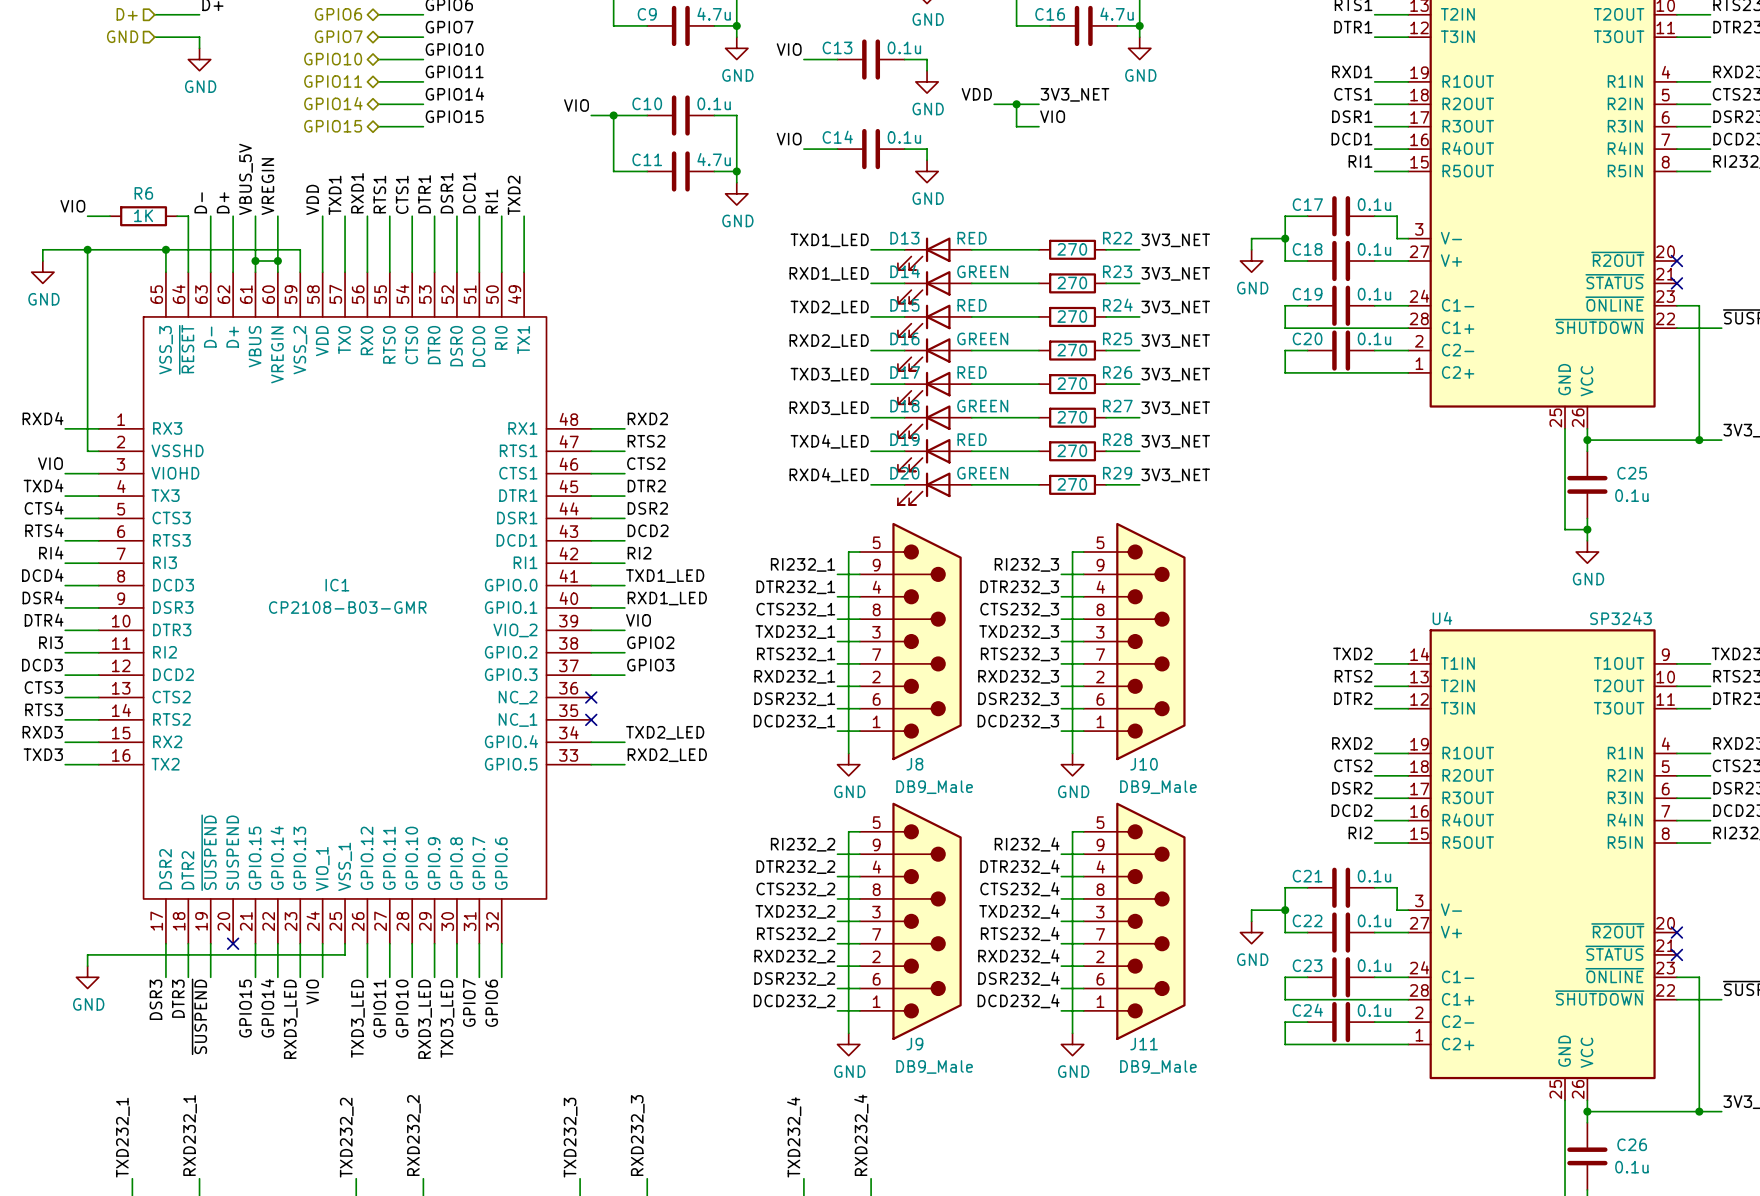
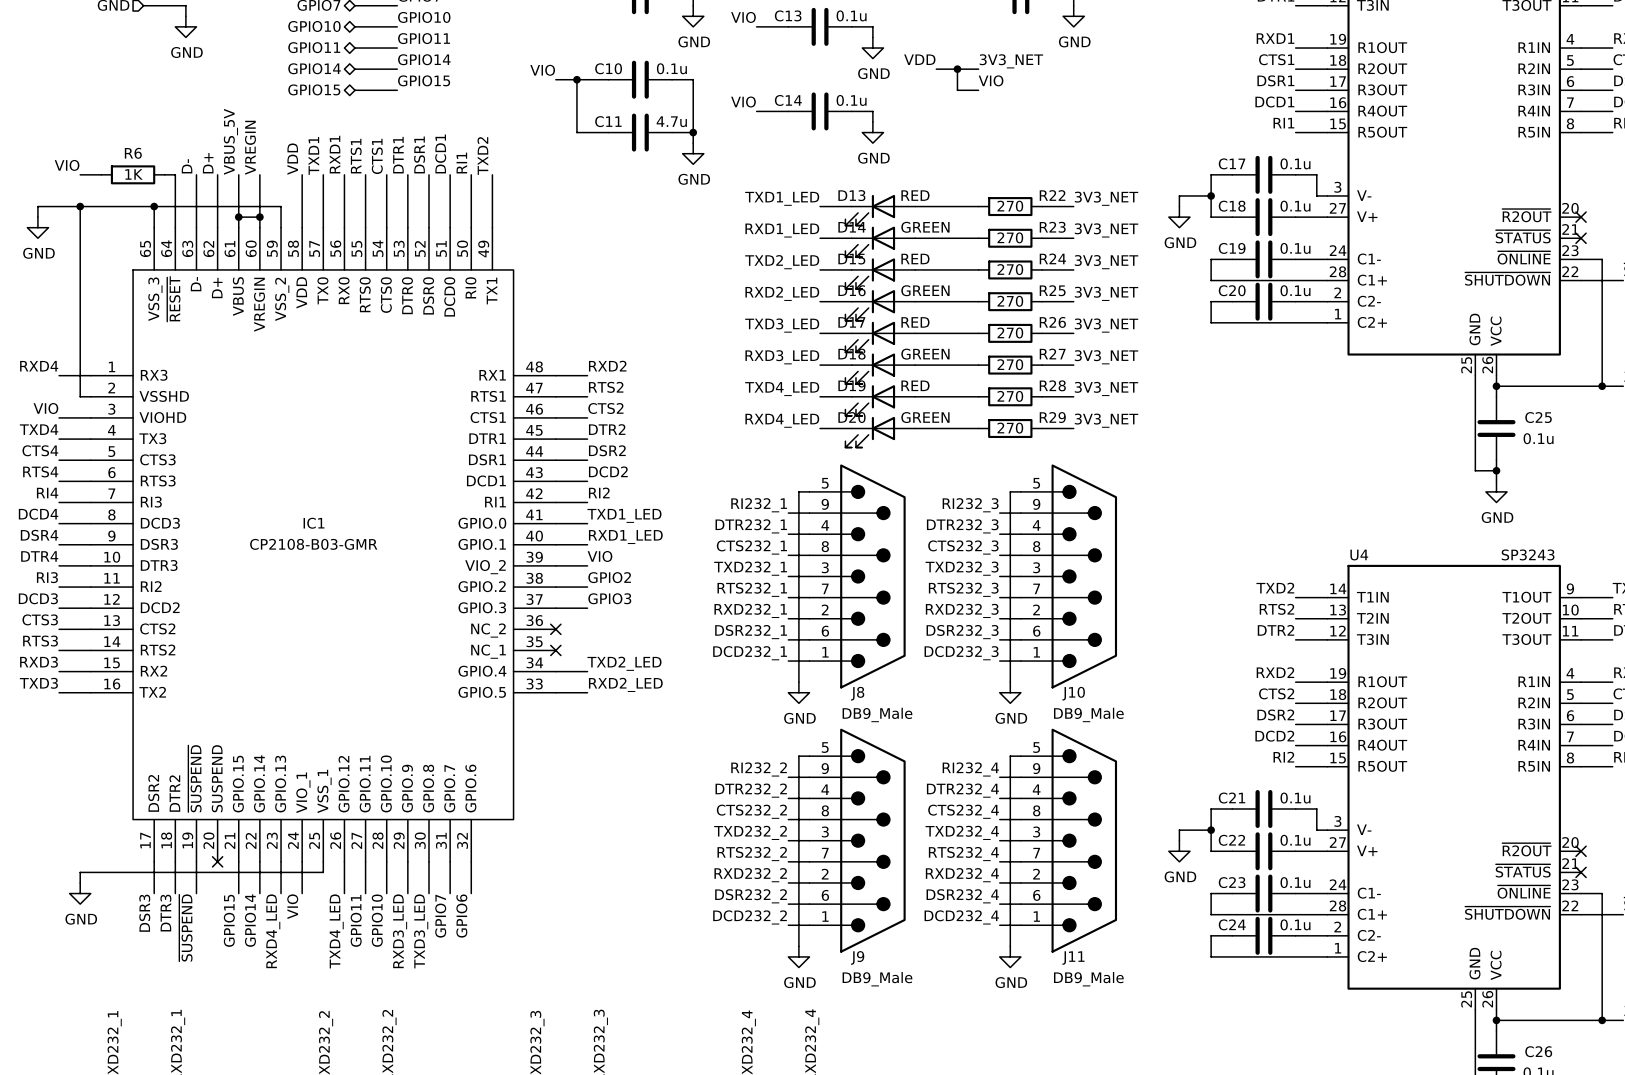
label: TXD3_LED (357, 1018) -> TXD4_LED (336, 931)
label: RXD3_LED (290, 1019) -> RXD4_LED (273, 931)

